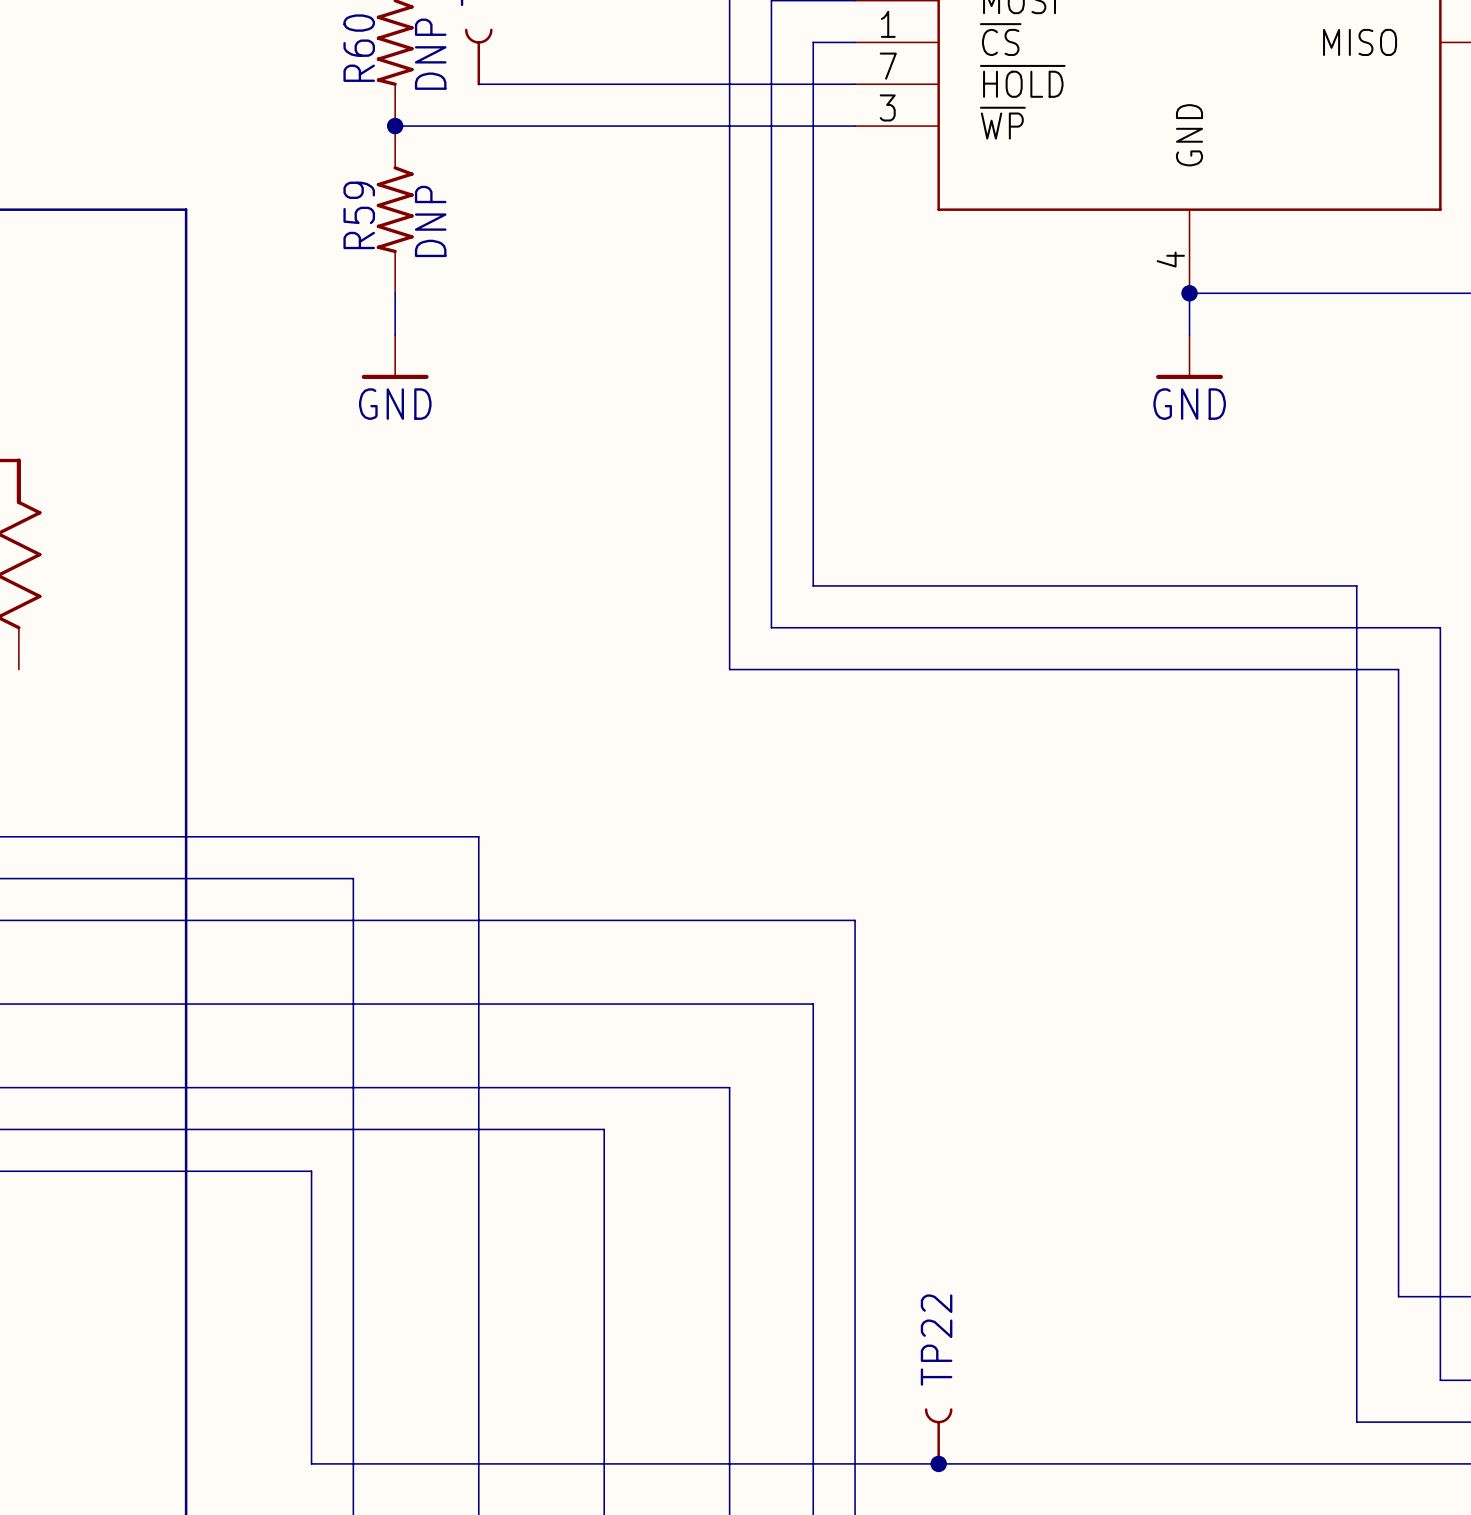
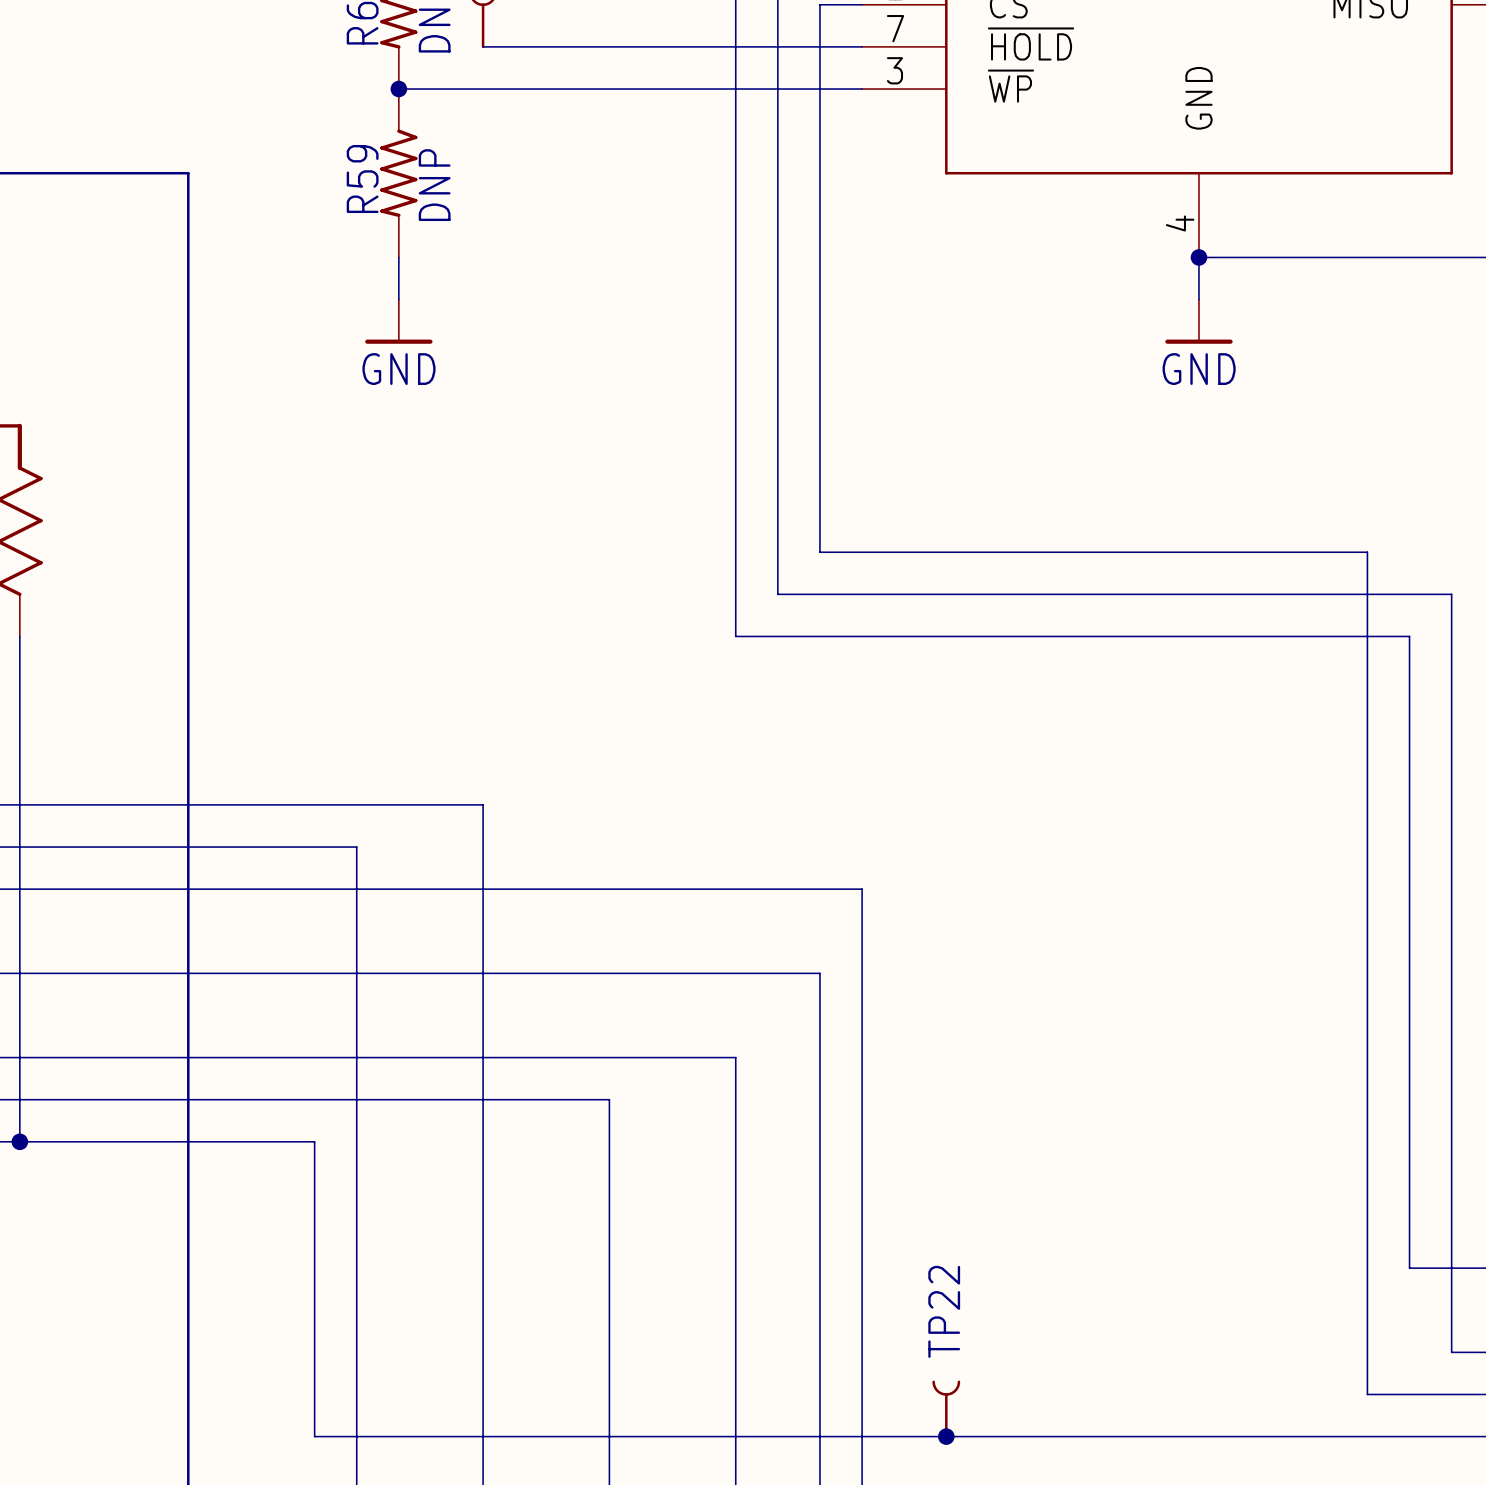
wire: none -> (19, 636) (19, 1141)
junction: none -> (19, 1141)

